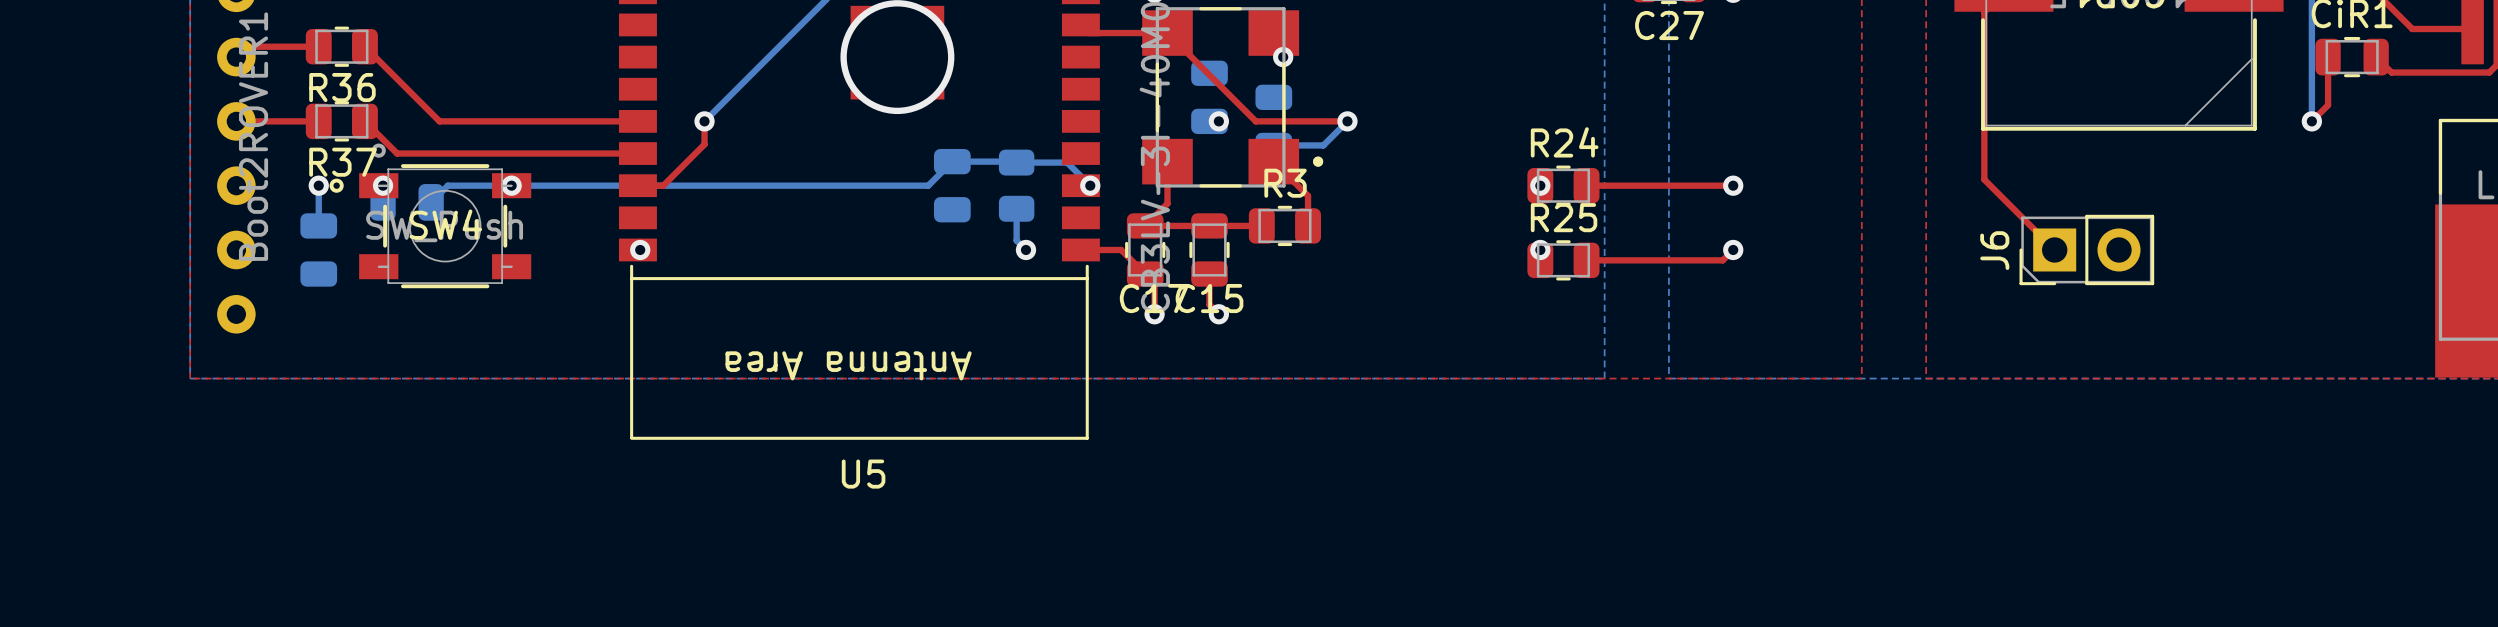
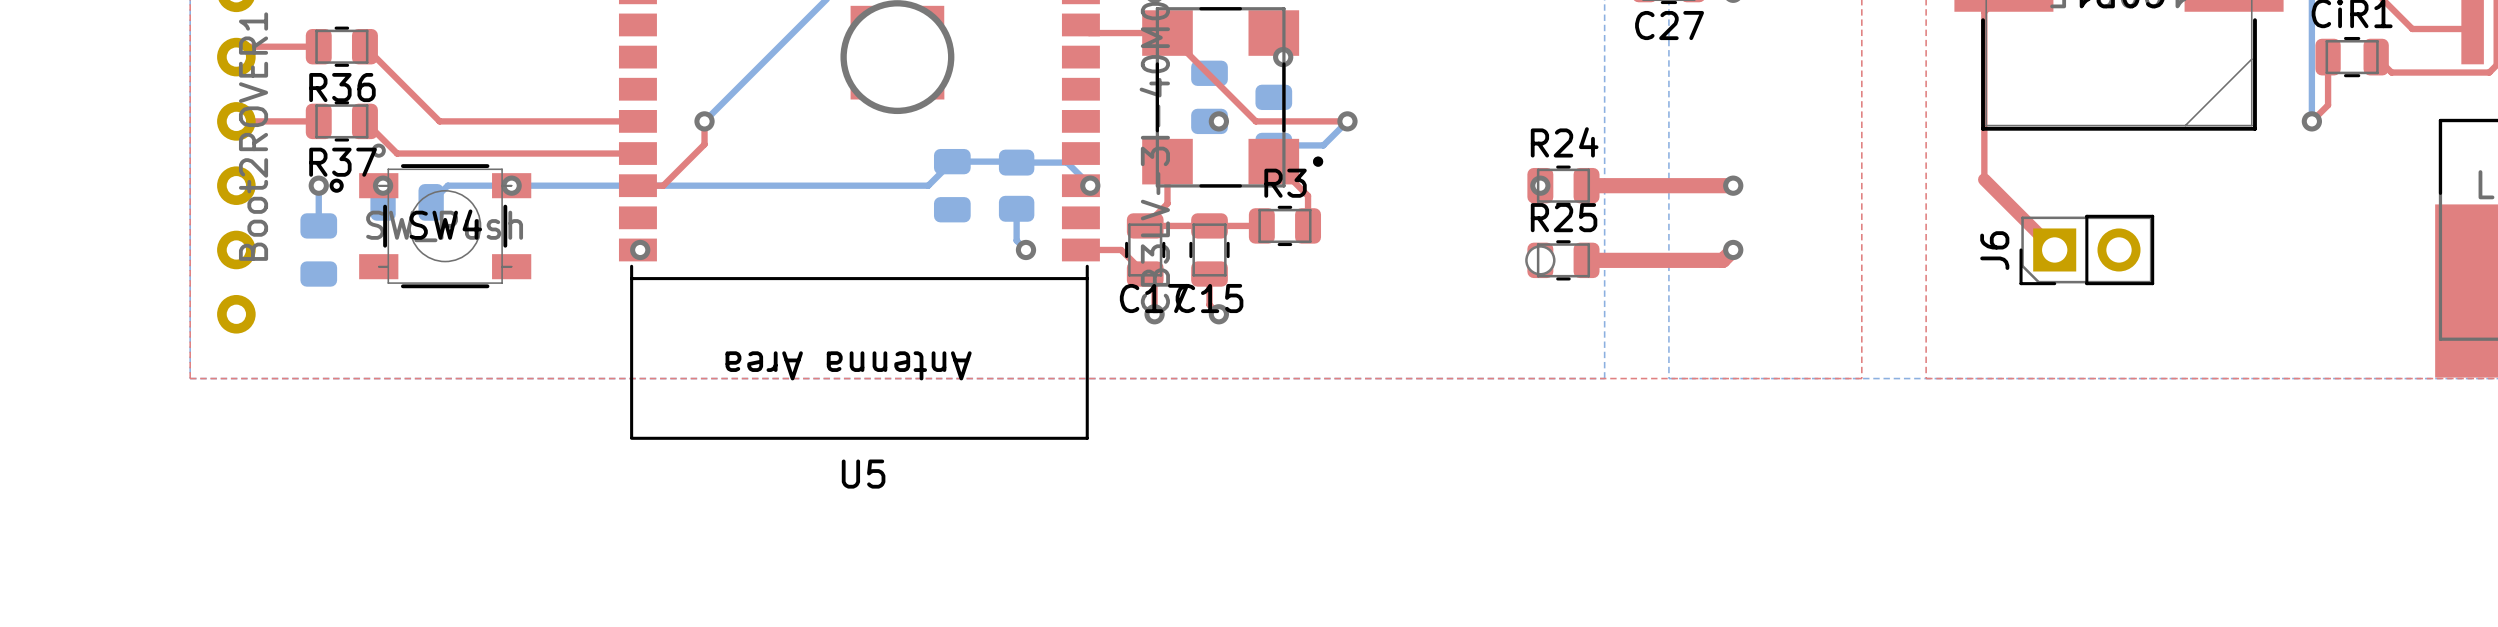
top track width: thin (1984, 179) (2054, 249) -> thick (1984, 179) (2054, 249)
top track width: thin (1586, 185) (1733, 185) -> thick (1586, 185) (1733, 185)
via size: [1530, 239, 1551, 261] -> [1525, 245, 1556, 276]
top track width: thin (1733, 249) (1722, 260) (1586, 260) -> thick (1733, 249) (1722, 260) (1586, 260)

